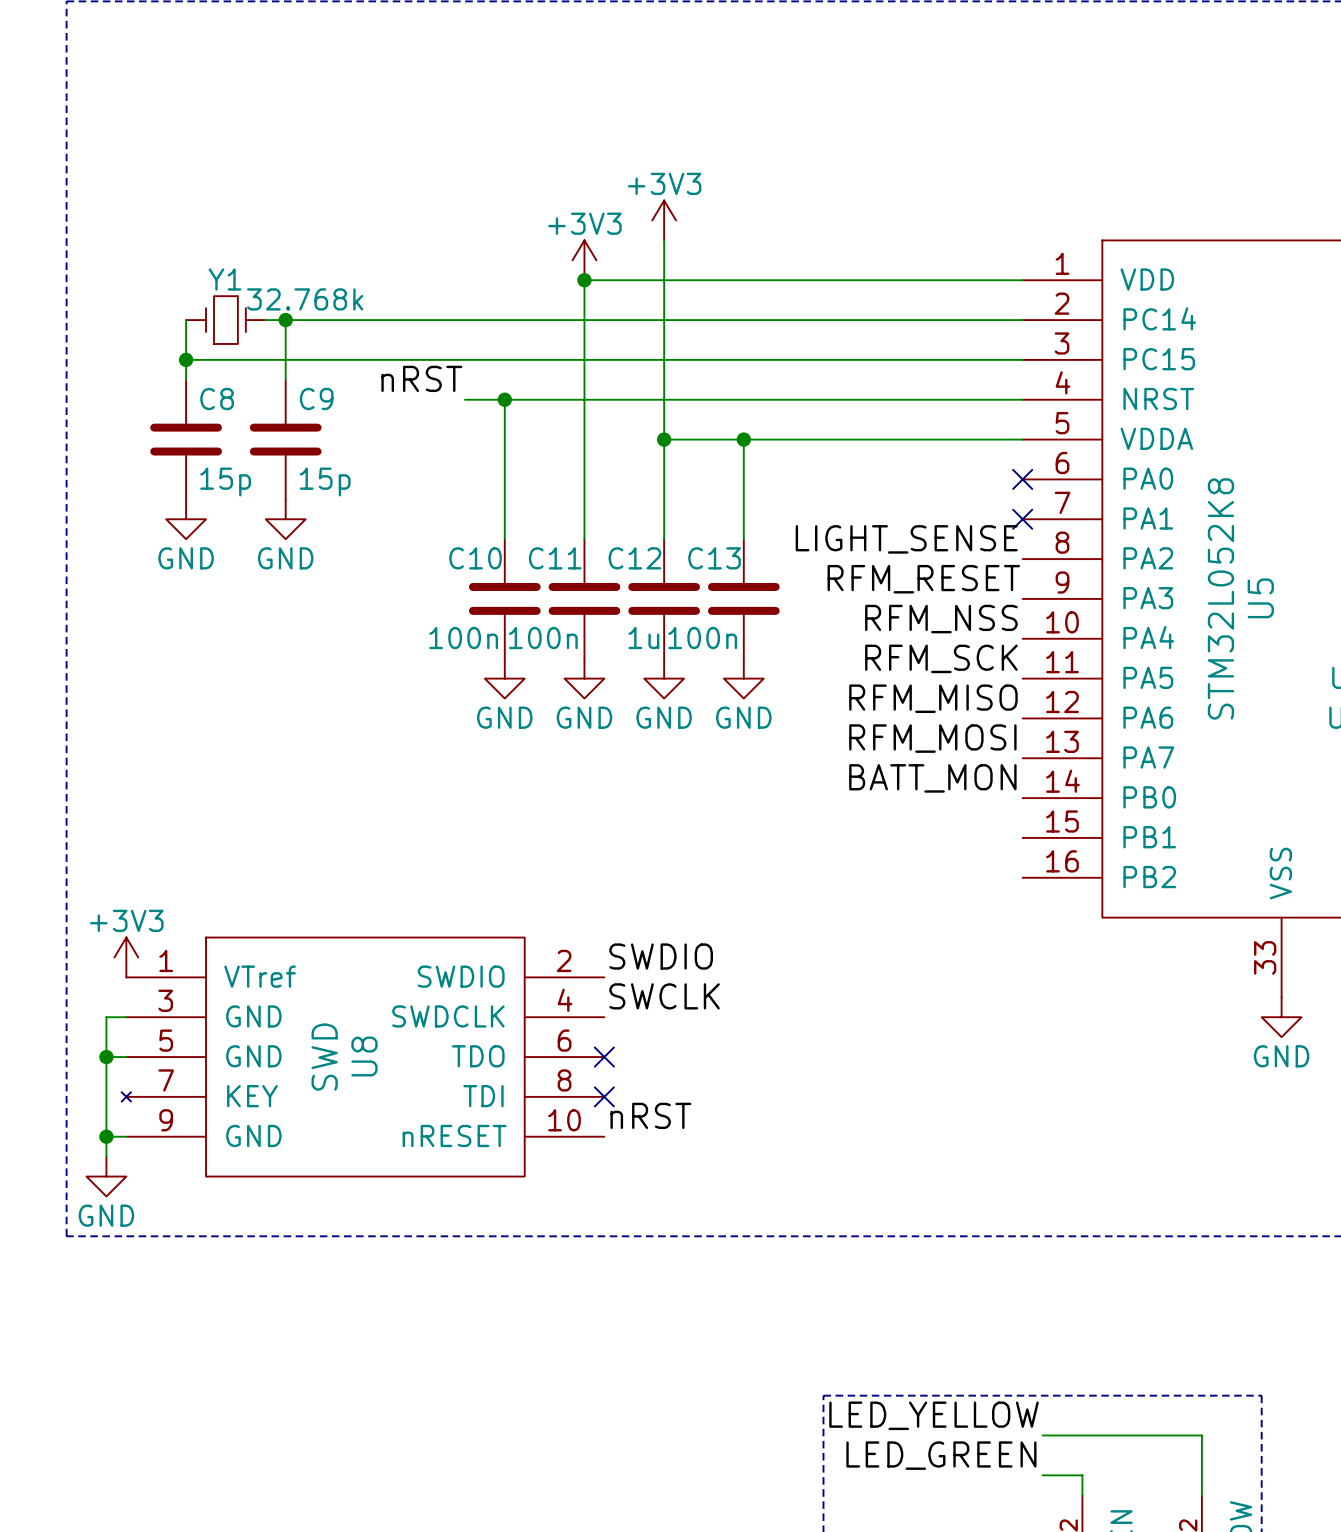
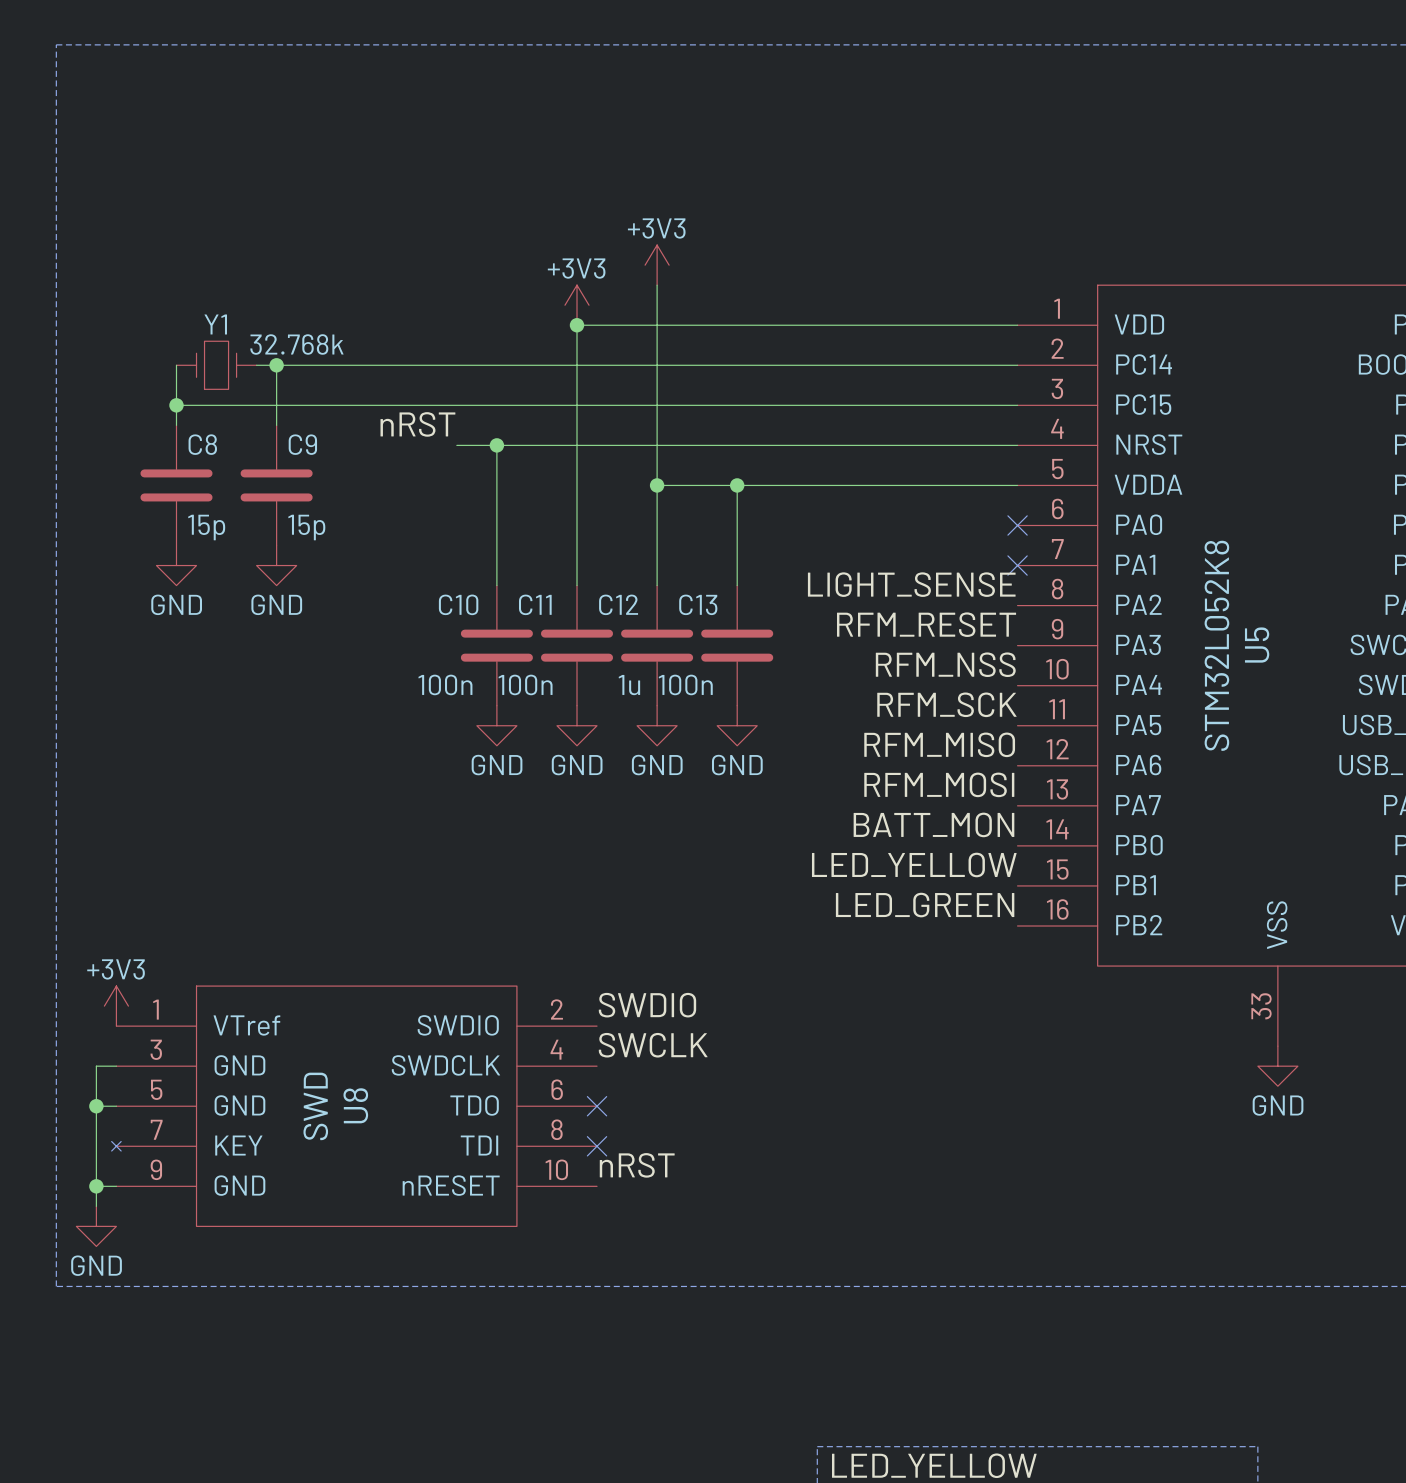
label: none -> LED_YELLOW (914, 864)
label: none -> LED_GREEN (925, 905)

